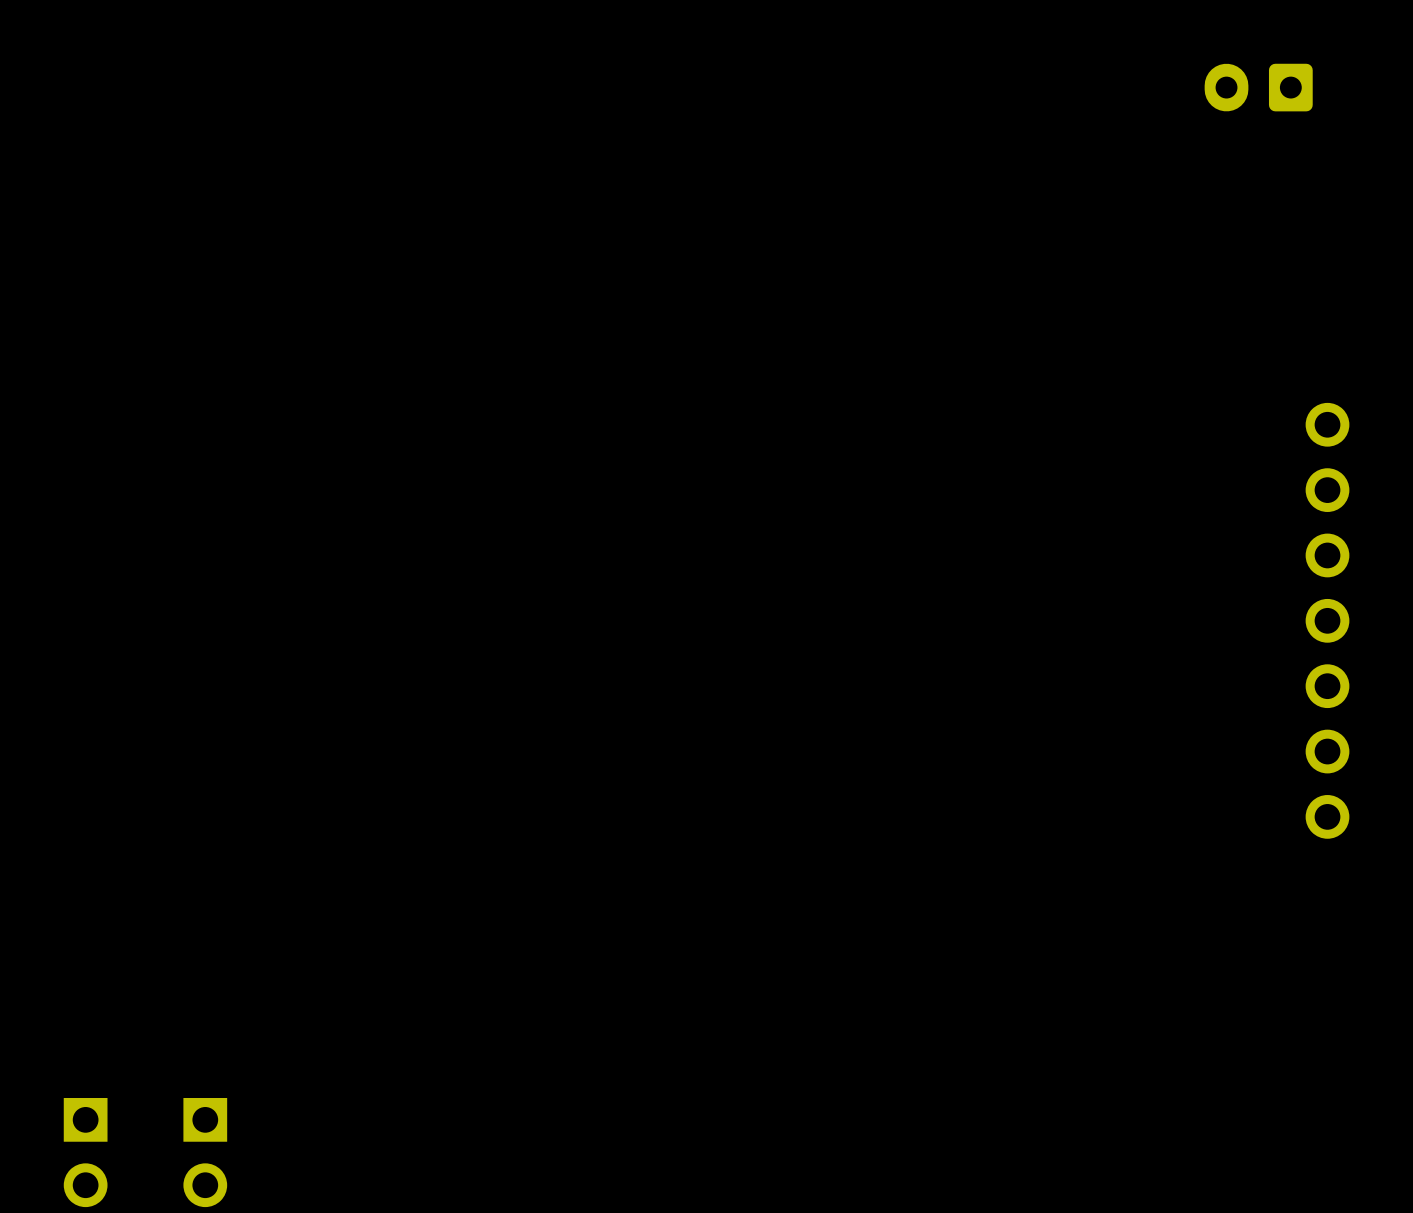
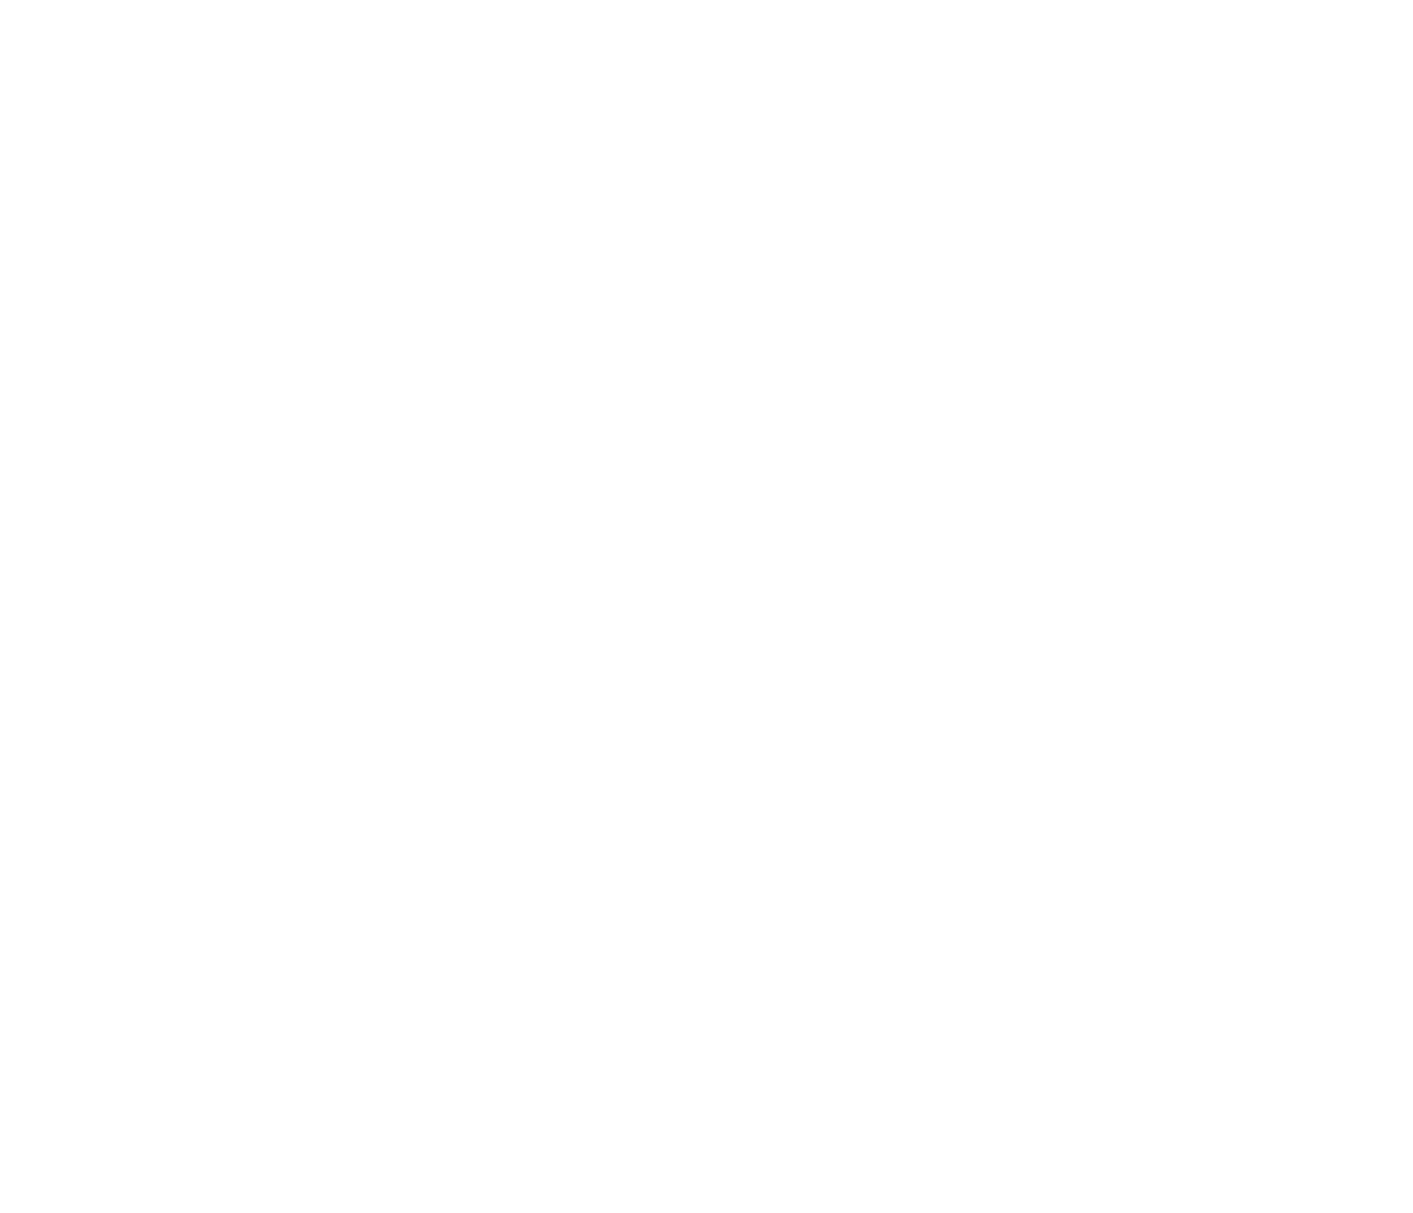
part: (1258, 87) -> none
part: (1327, 620) -> none
part: (85, 1152) -> none
part: (205, 1152) -> none

